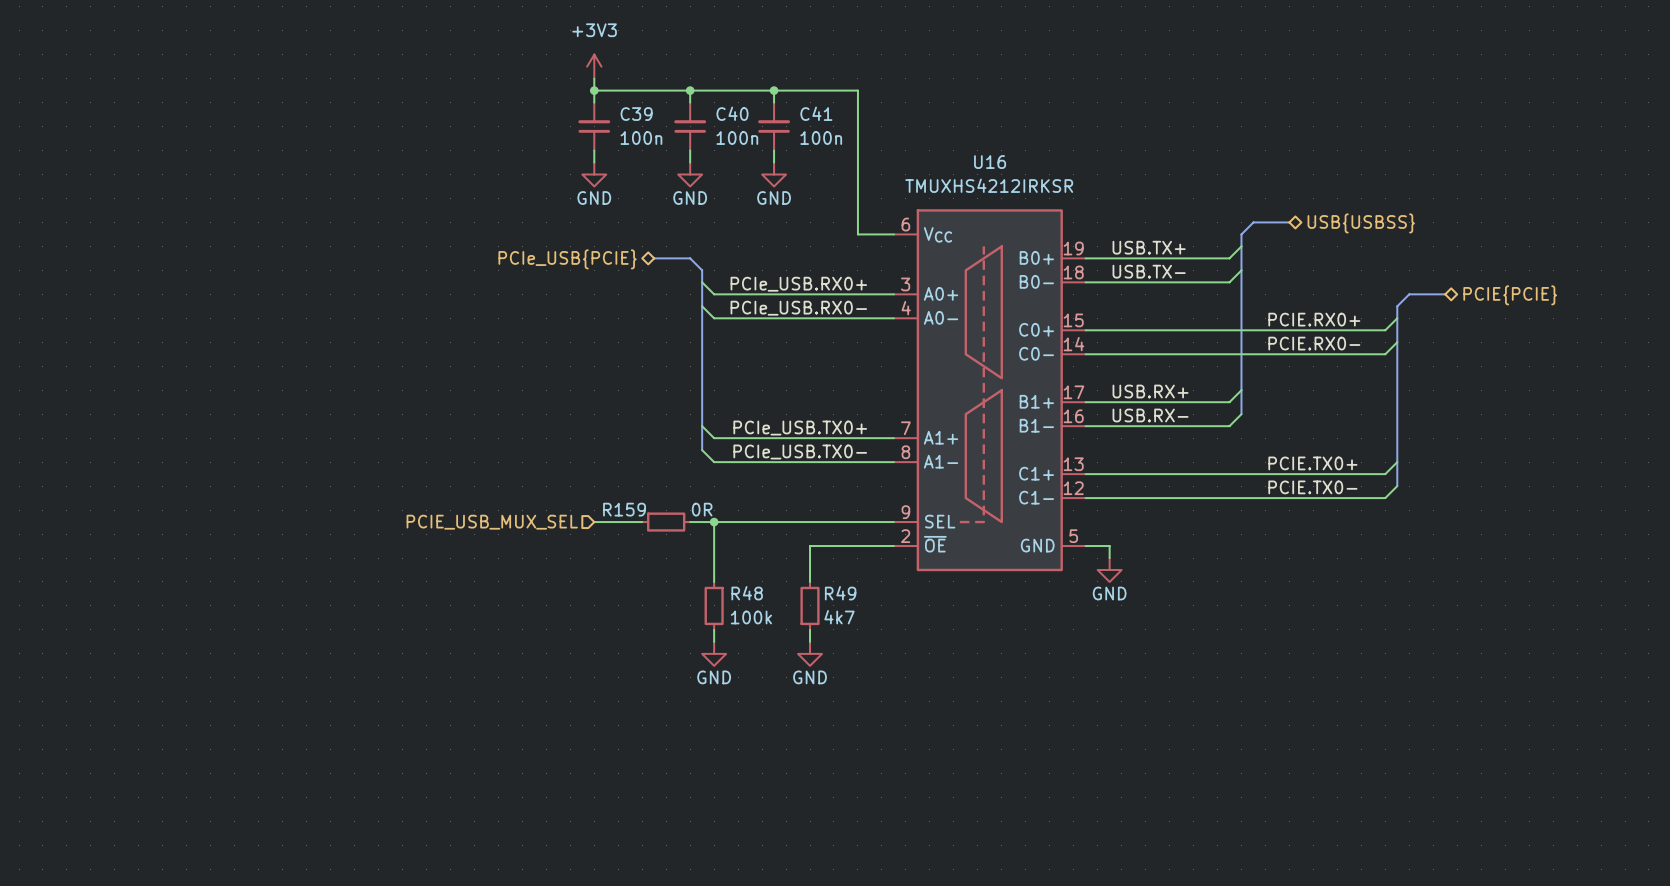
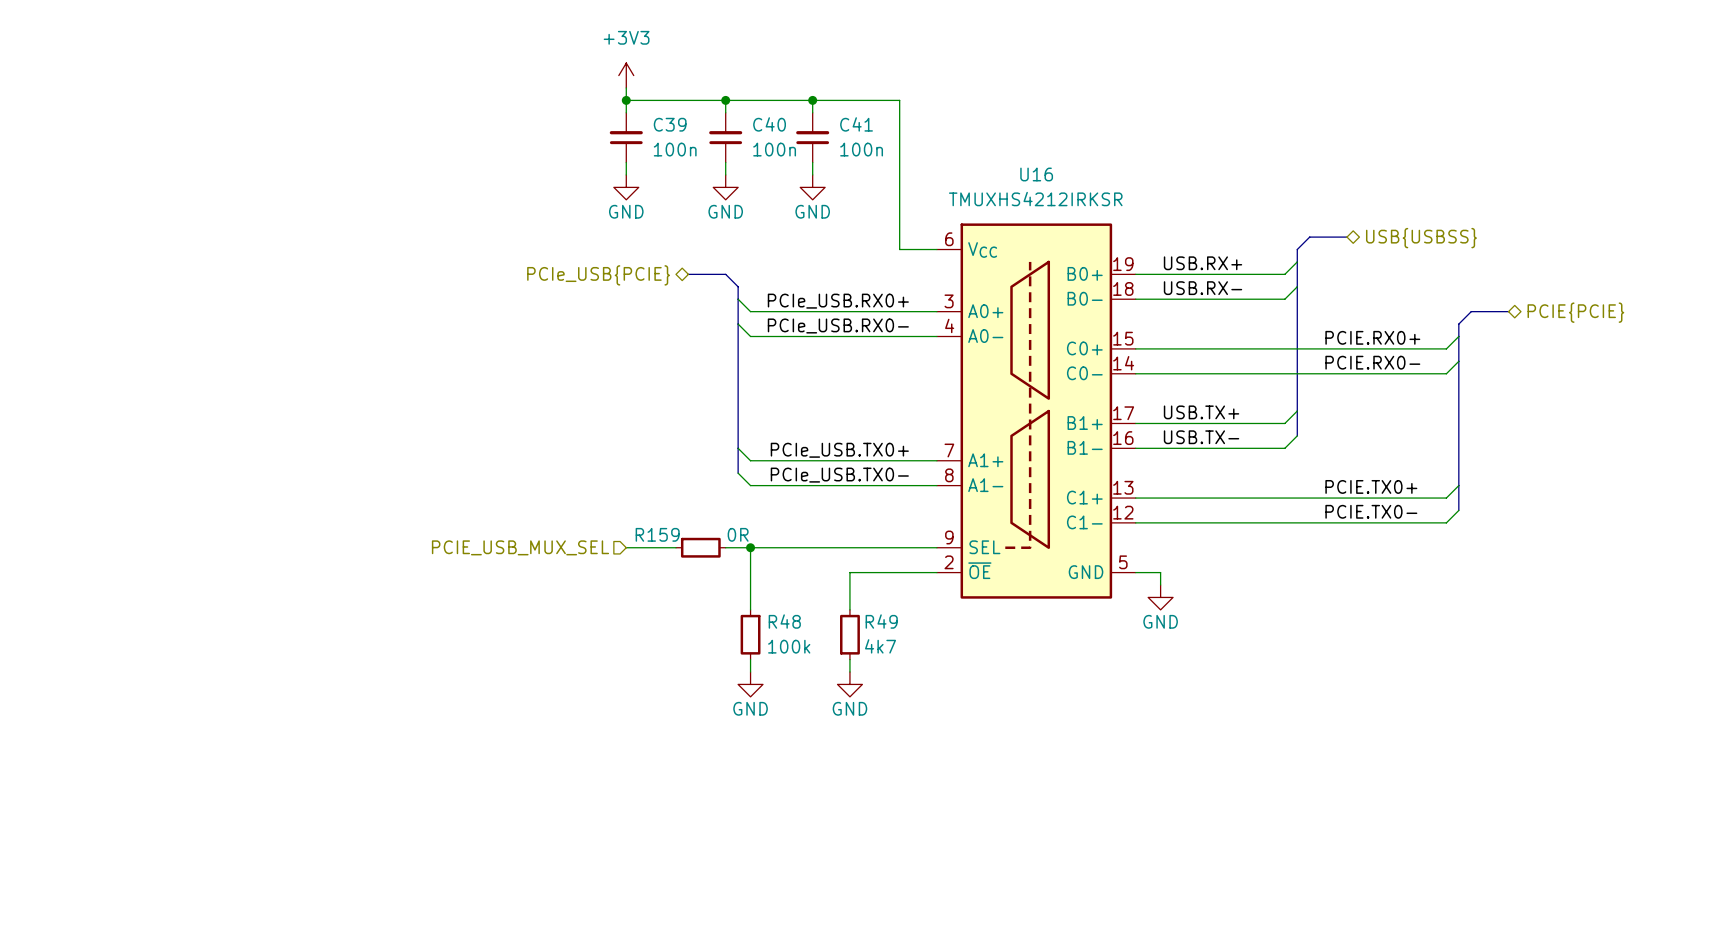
label: USB.TX+ (1149, 247) -> USB.RX+ (1203, 263)
label: USB.TX- (1149, 271) -> USB.RX- (1203, 288)
label: USB.RX+ (1150, 391) -> USB.TX+ (1201, 412)
label: USB.RX- (1150, 415) -> USB.TX- (1201, 437)

